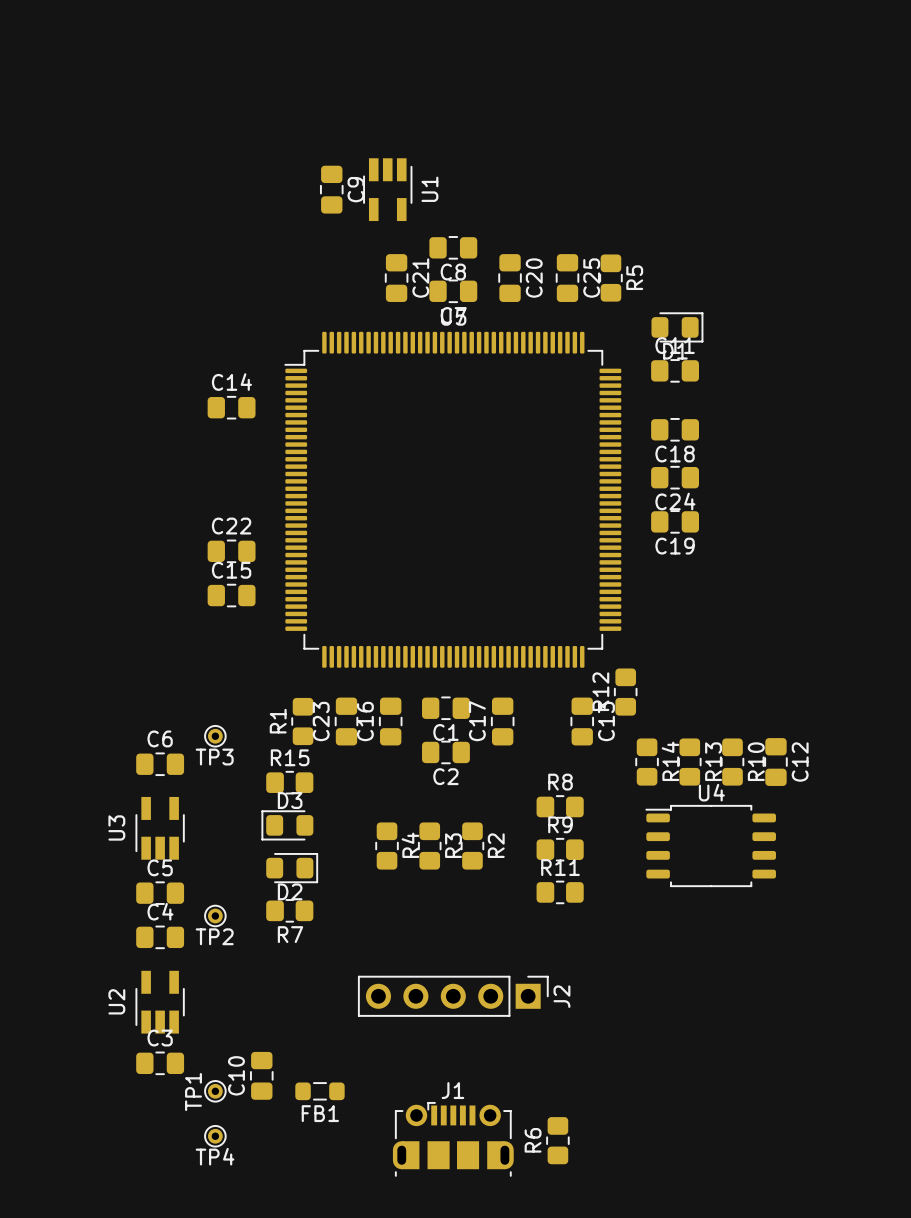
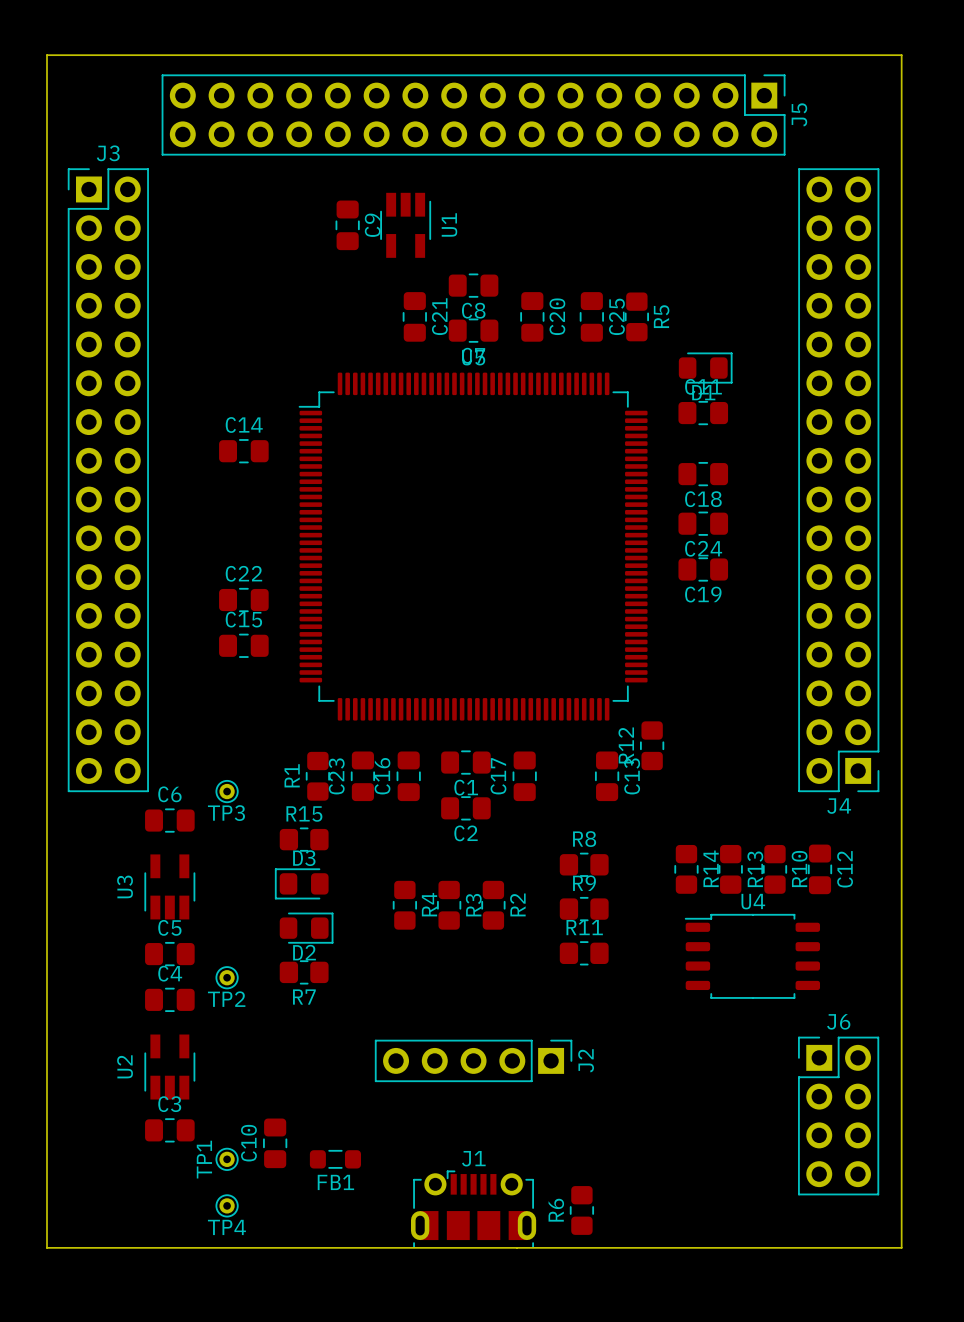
board edge: none -> (46, 55) (46, 1247) (901, 1247) (901, 55) (46, 55)
J5: none -> (473, 114)
J3: none -> (108, 480)
J4: none -> (838, 480)
R14 position: (647, 762) -> (686, 869)
R13 position: (689, 762) -> (730, 869)
R10 position: (732, 762) -> (774, 869)
C12 position: (775, 762) -> (820, 869)
U4 position: (710, 846) -> (752, 956)
J6: none -> (838, 1116)

